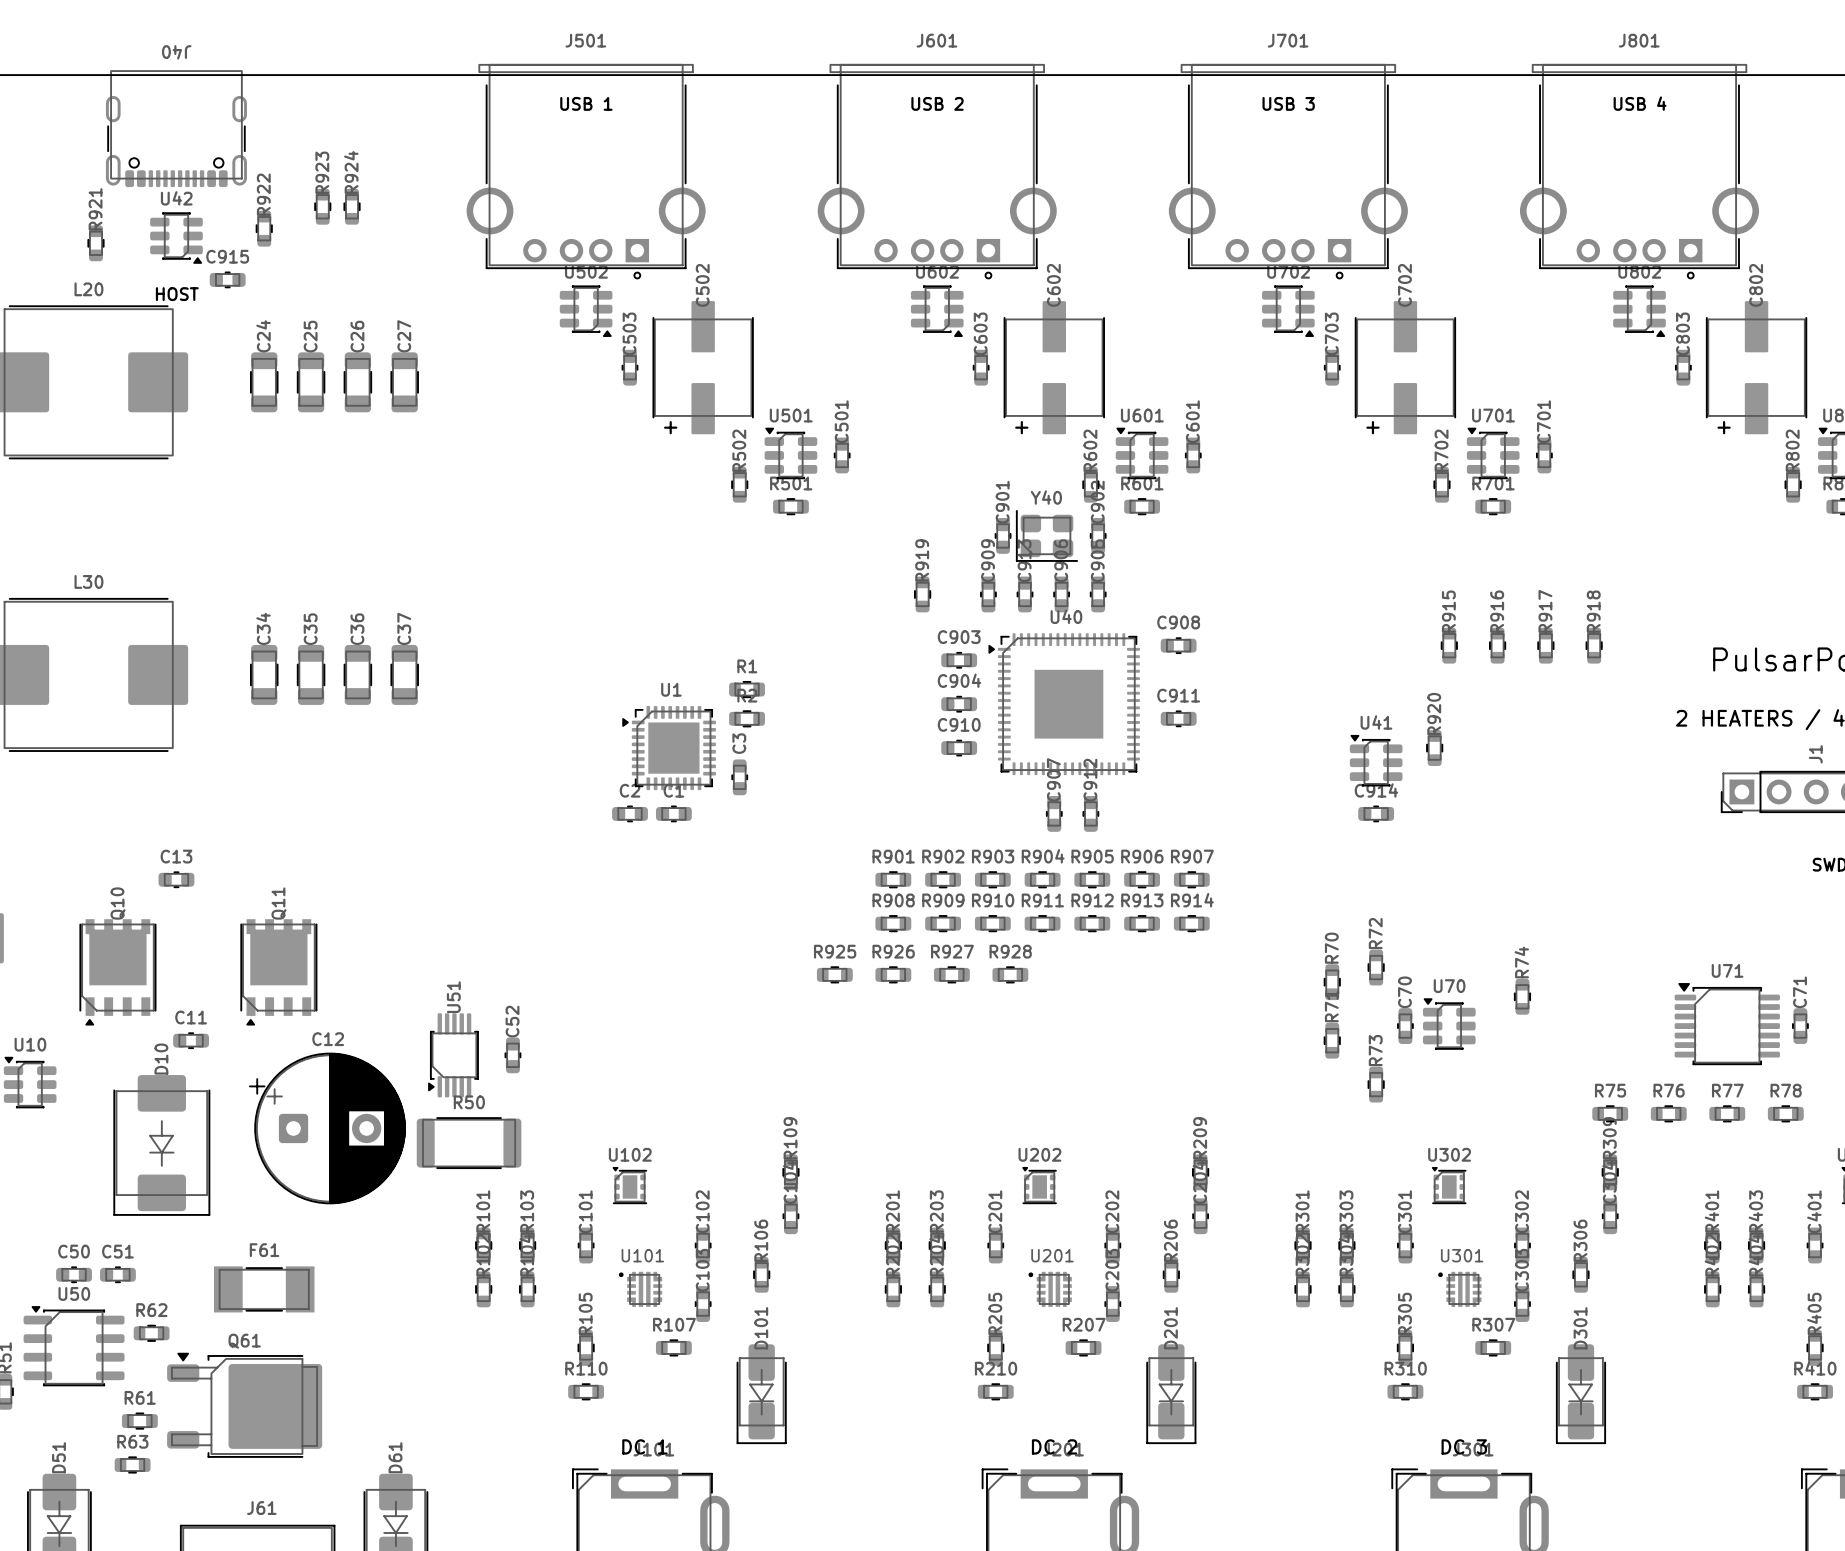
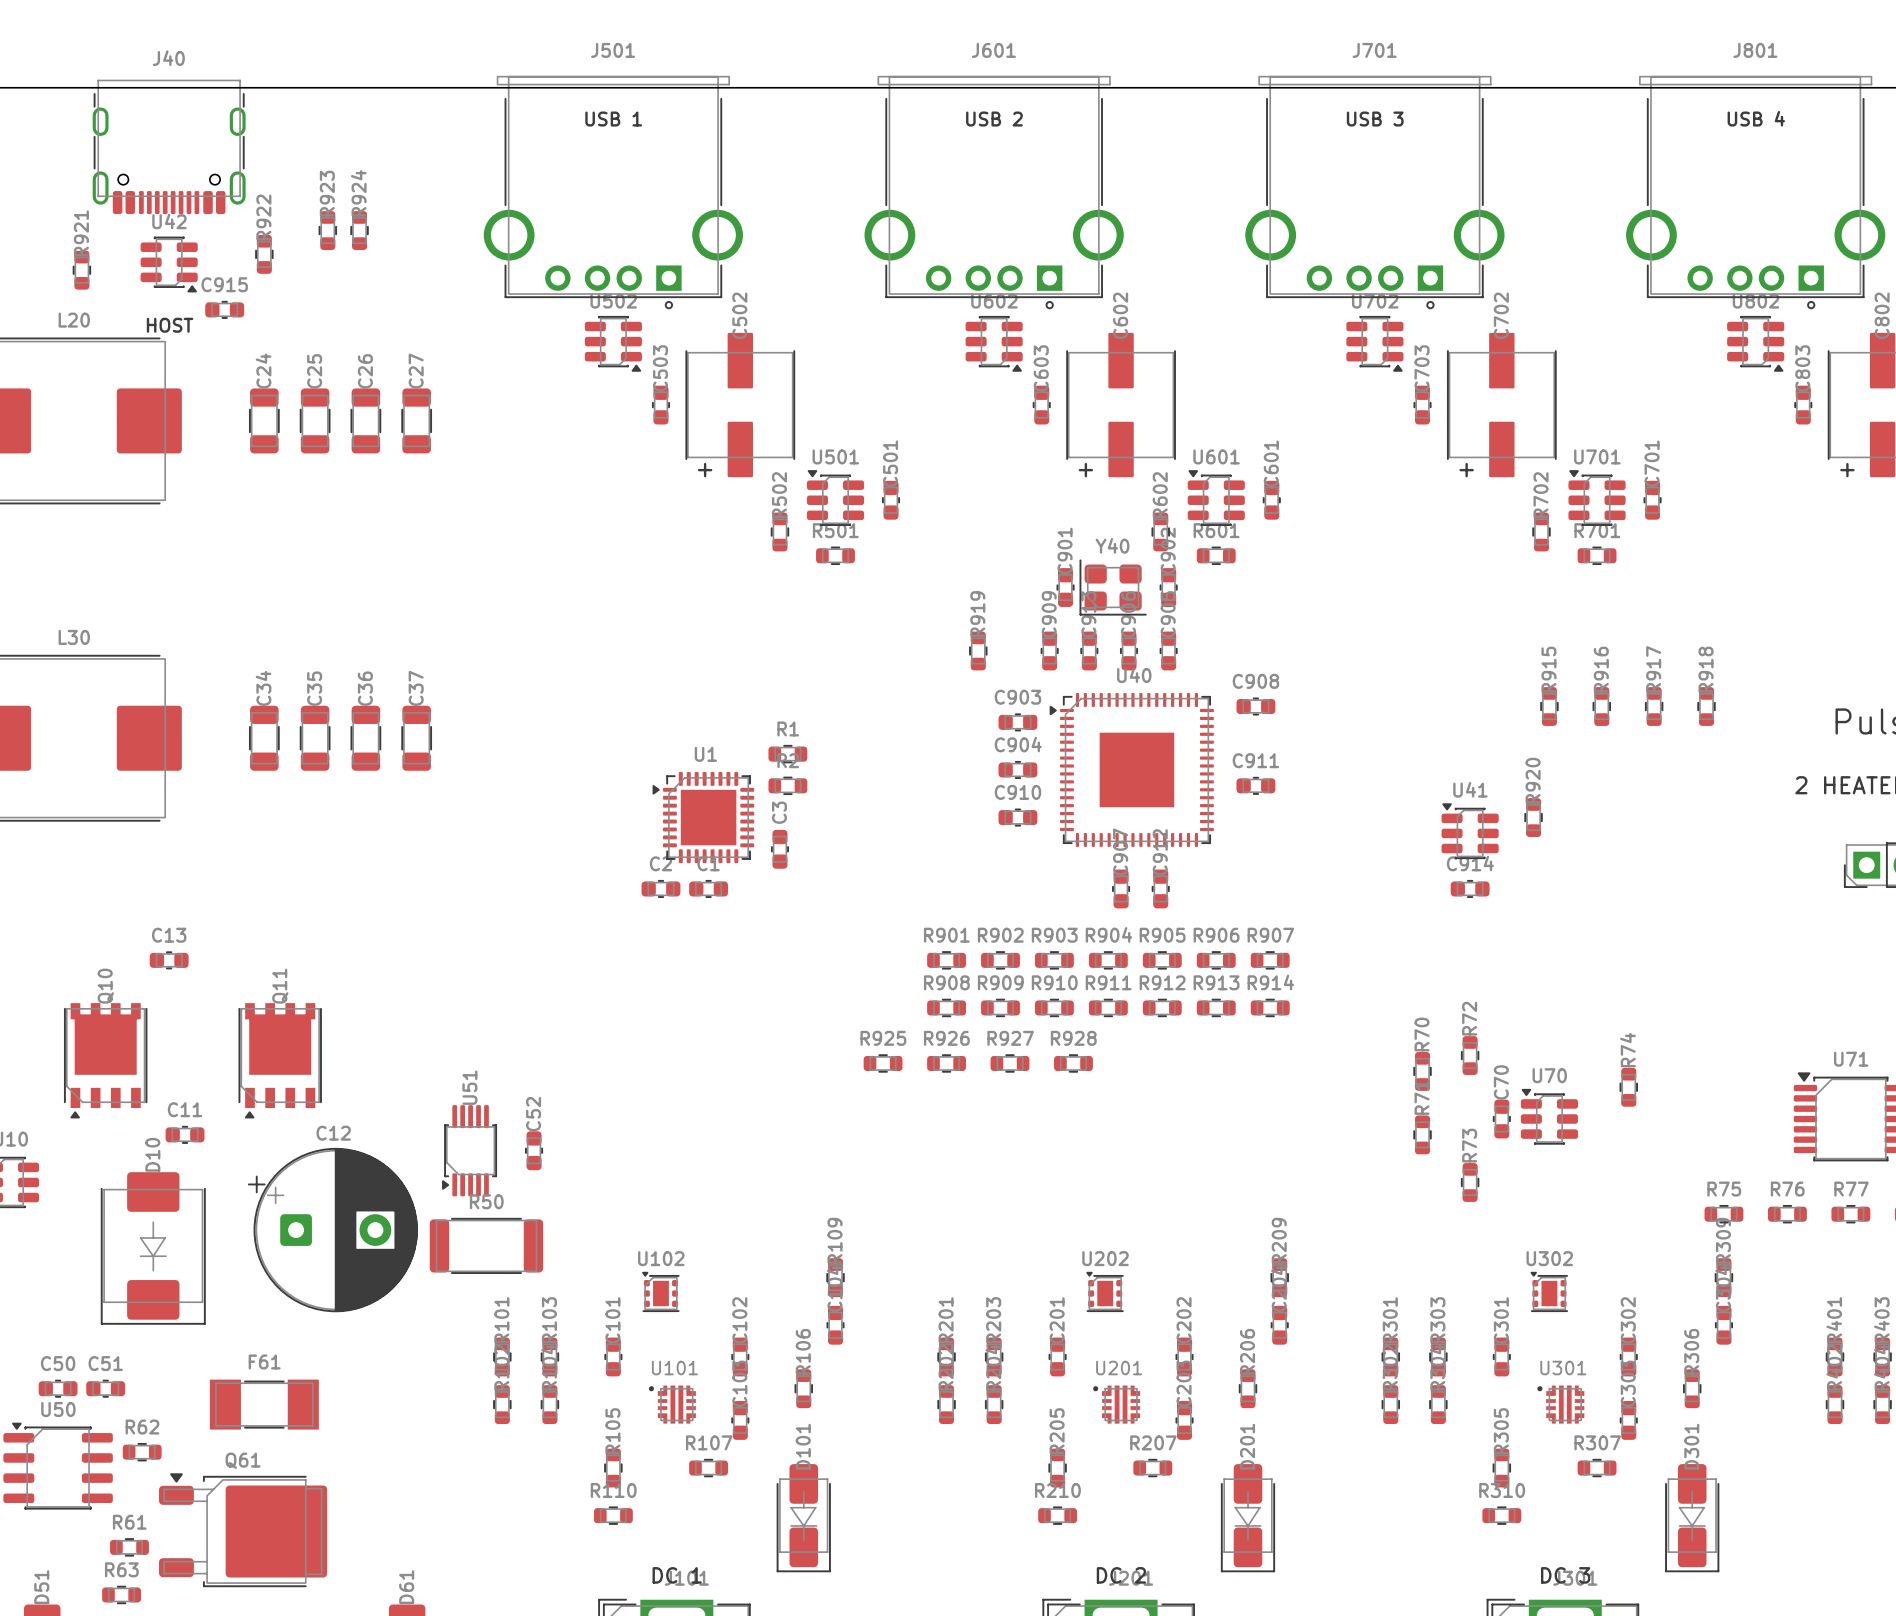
J40 footprint: [105, 70, 247, 188] -> [92, 79, 246, 215]

